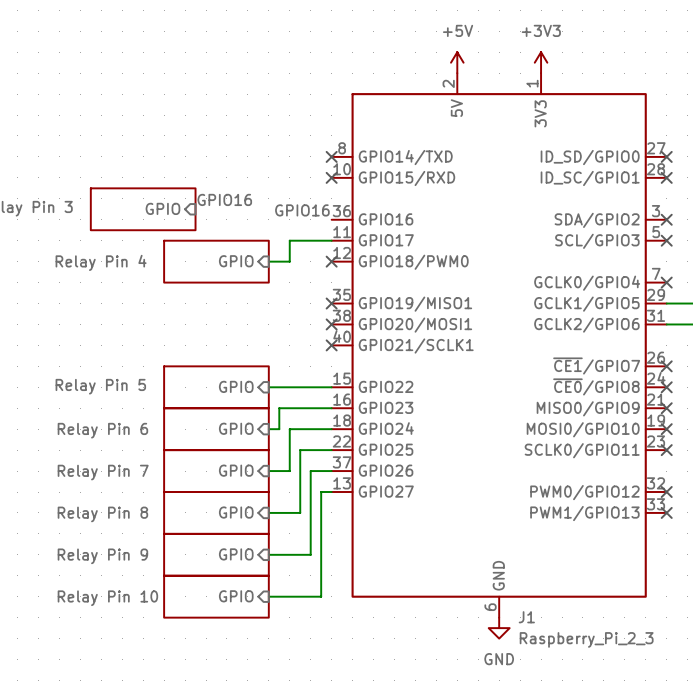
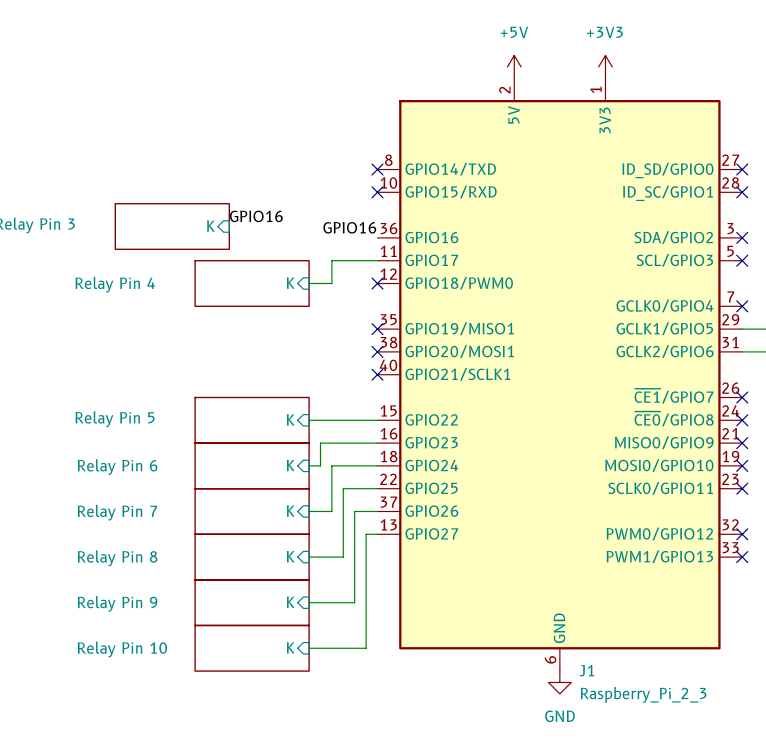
sheet pin: GPIO (162, 208) -> K (210, 226)
sheet pin: GPIO (236, 261) -> K (290, 283)
sheet pin: GPIO (236, 386) -> K (290, 419)
sheet pin: GPIO (236, 428) -> K (290, 465)
sheet pin: GPIO (236, 470) -> K (290, 511)
sheet pin: GPIO (236, 512) -> K (290, 556)
sheet pin: GPIO (236, 554) -> K (290, 602)
sheet pin: GPIO (236, 596) -> K (290, 647)

